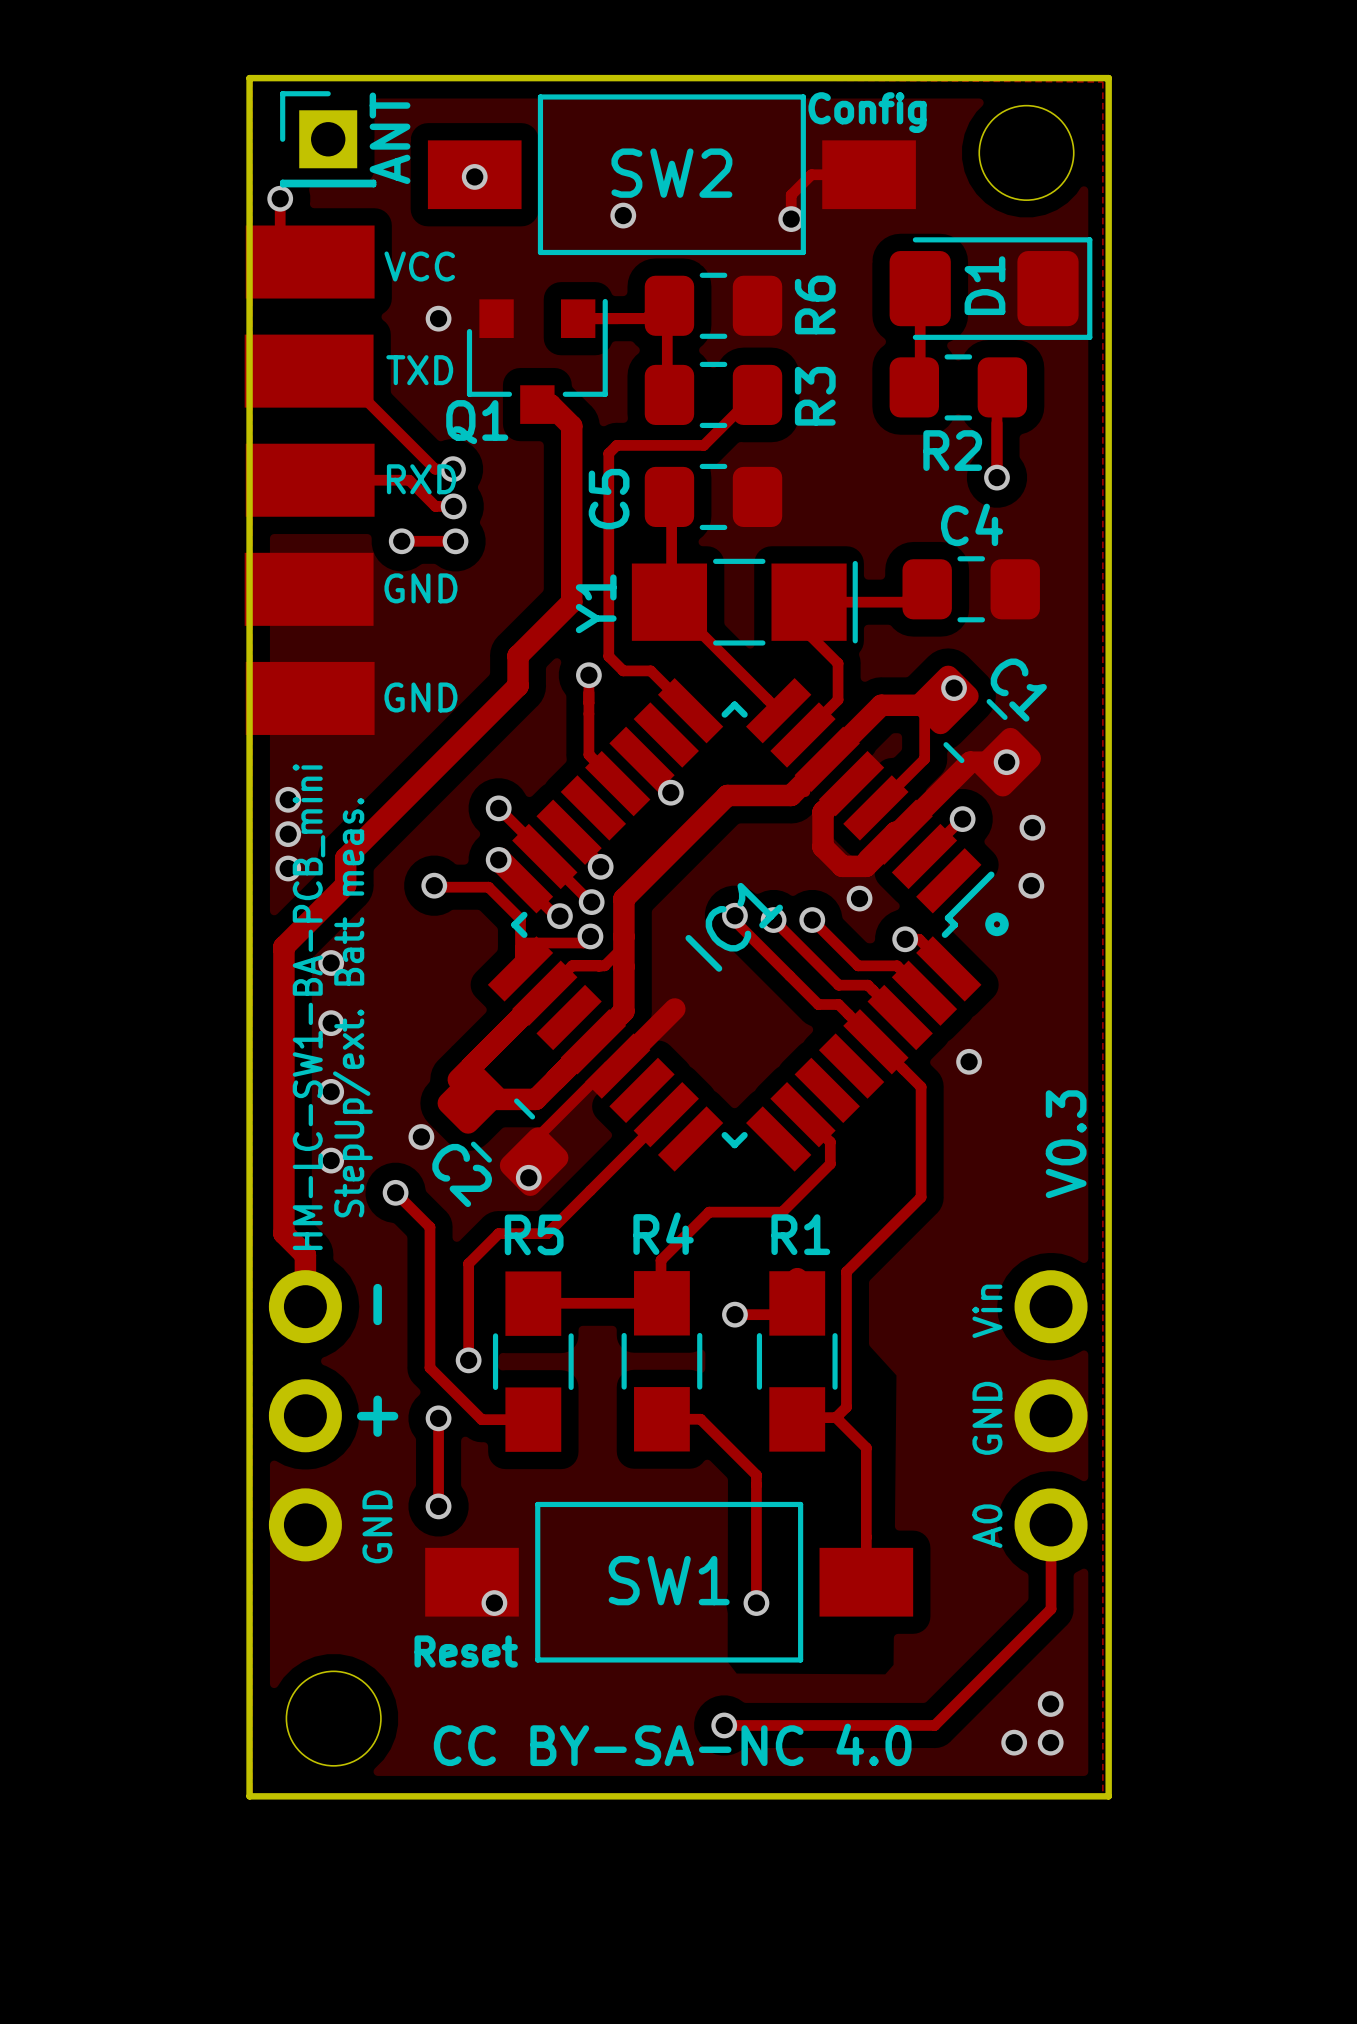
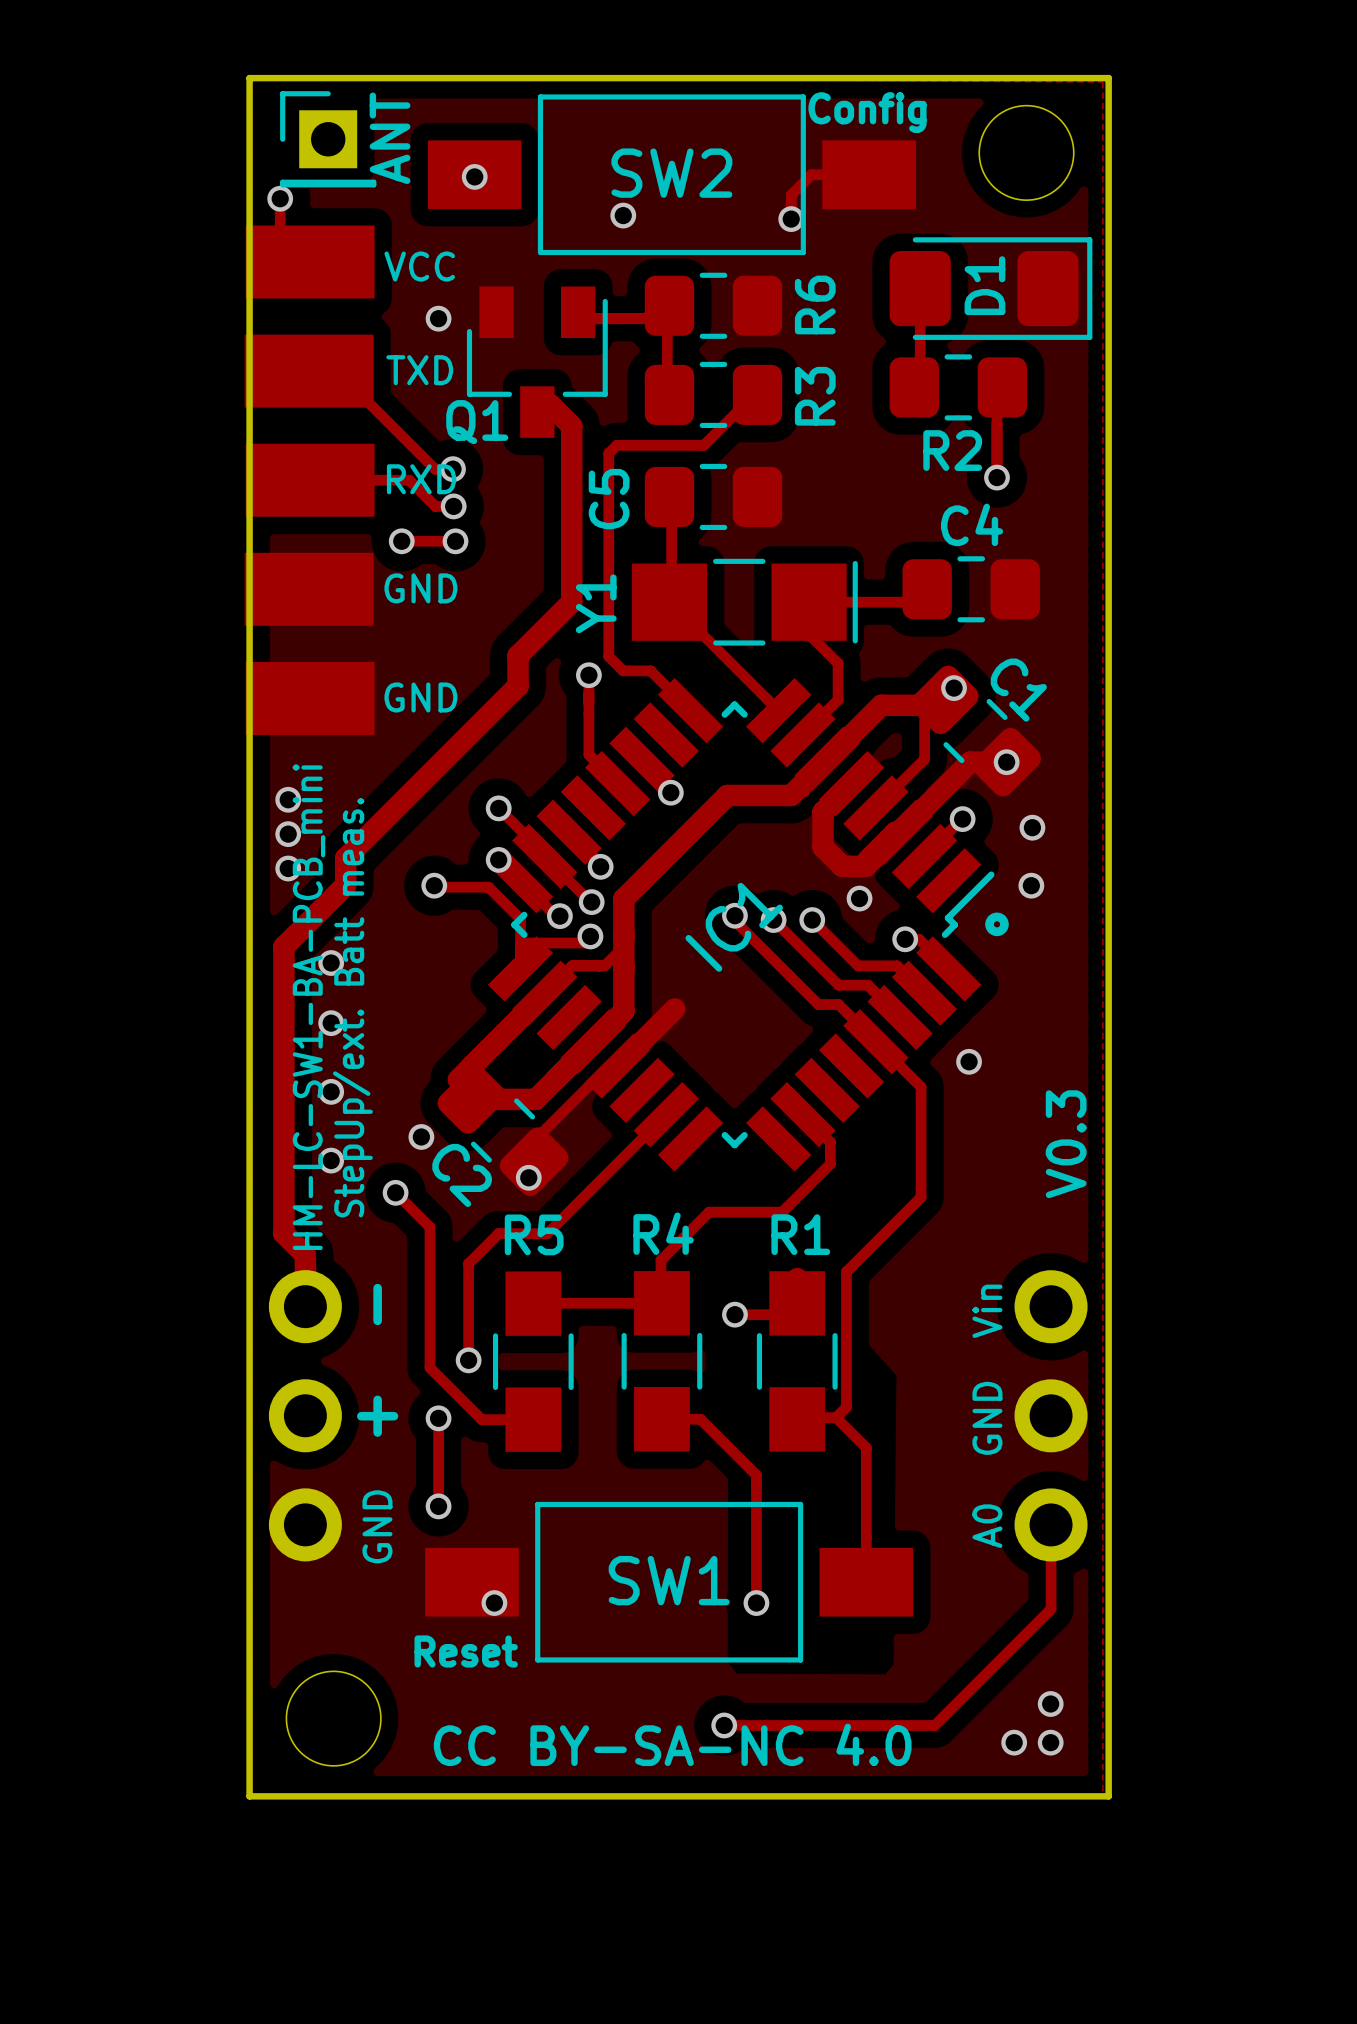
Q1 footprint: [466, 298, 608, 424] -> [466, 286, 608, 438]

